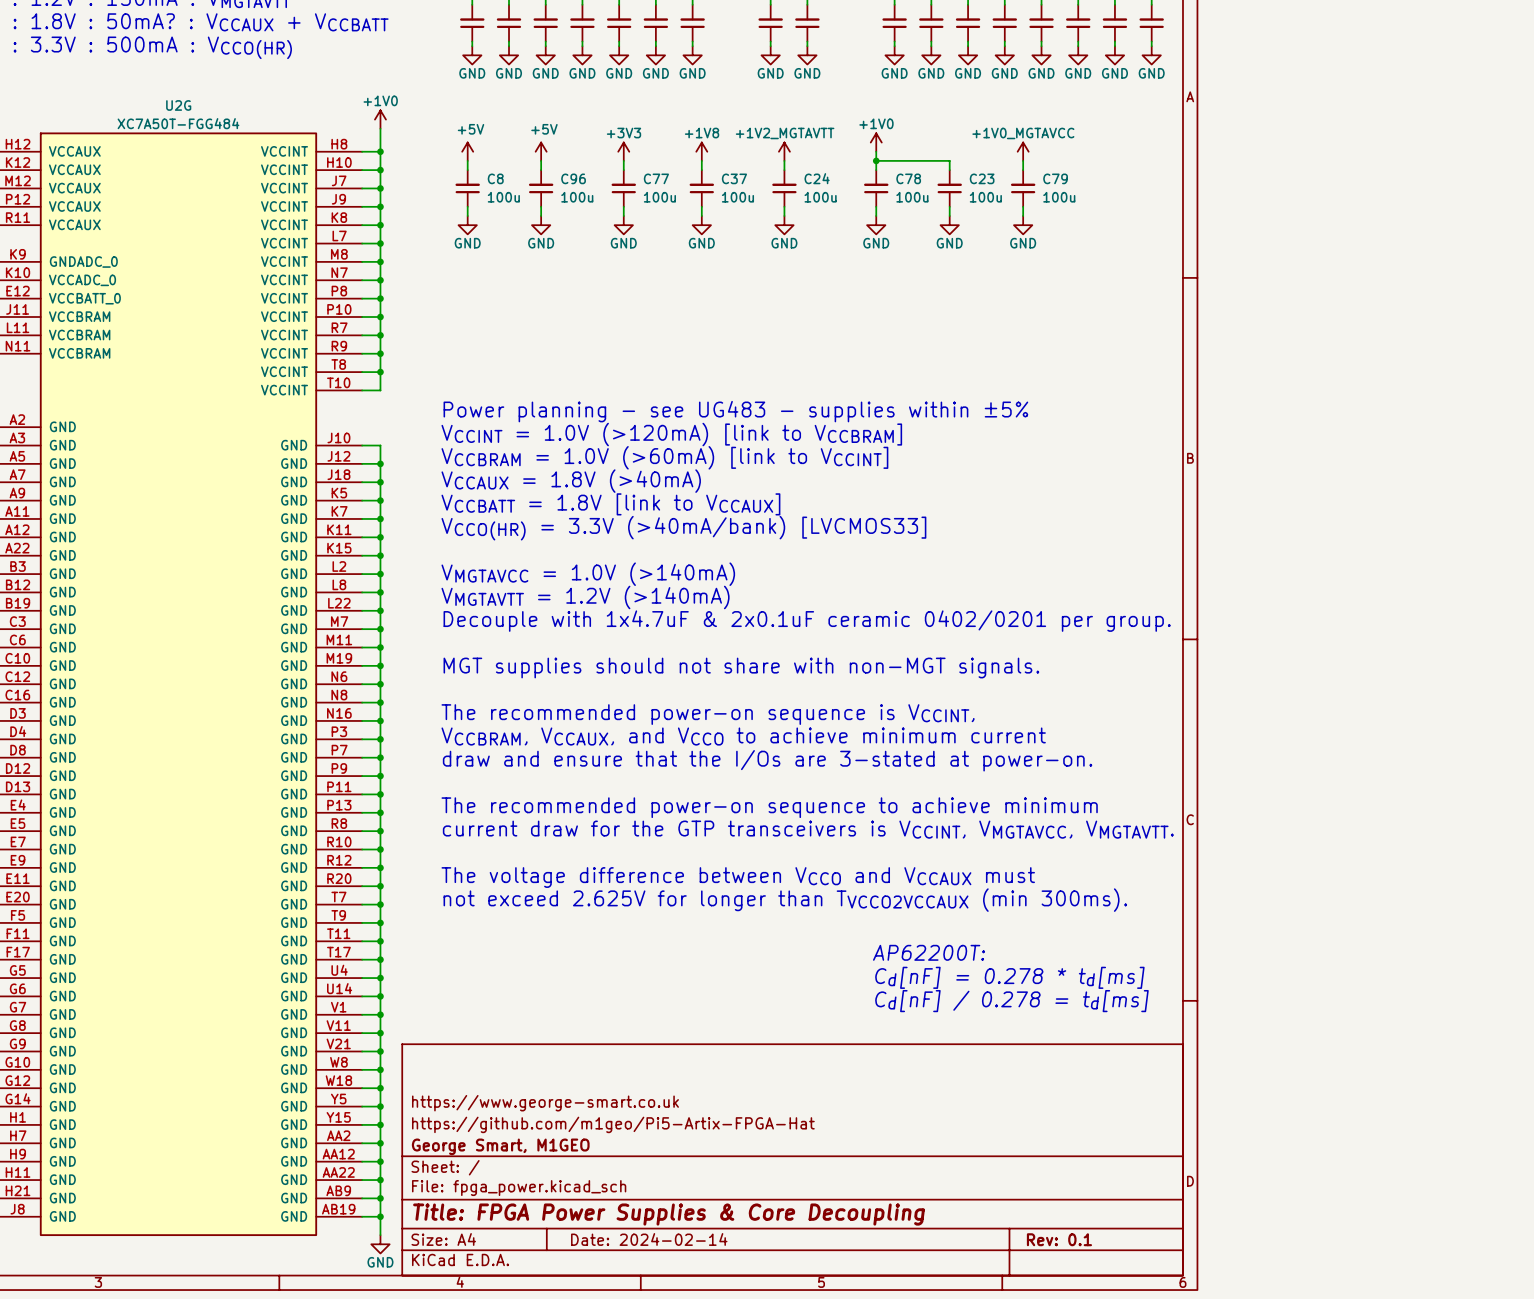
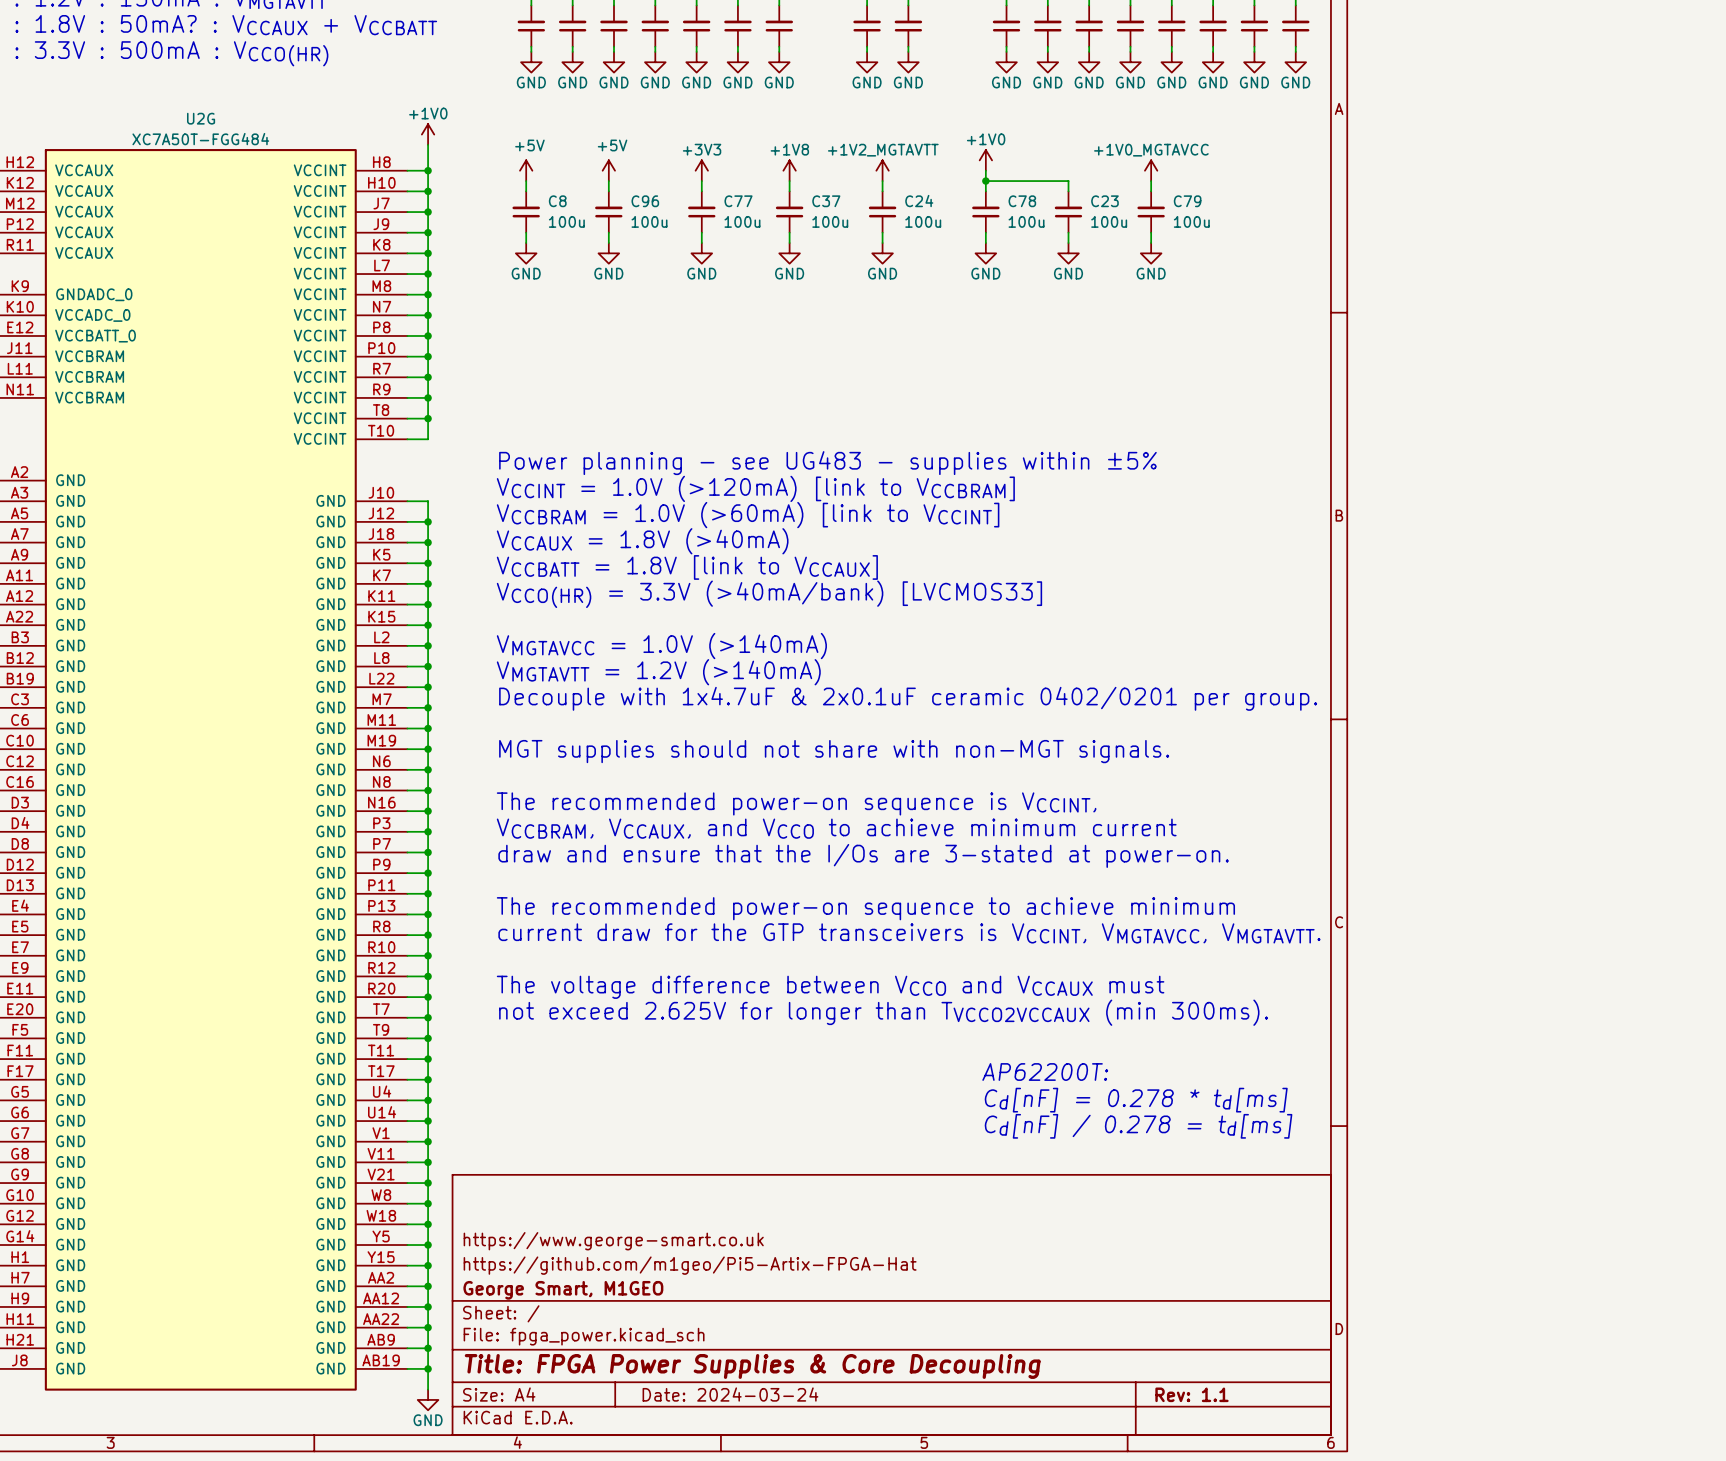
title block: Date: 2024-02-14 (649, 1239) -> Date: 2024-03-24 (730, 1394)
title block: Rev: 0.1 (1059, 1239) -> Rev: 1.1 (1191, 1394)

